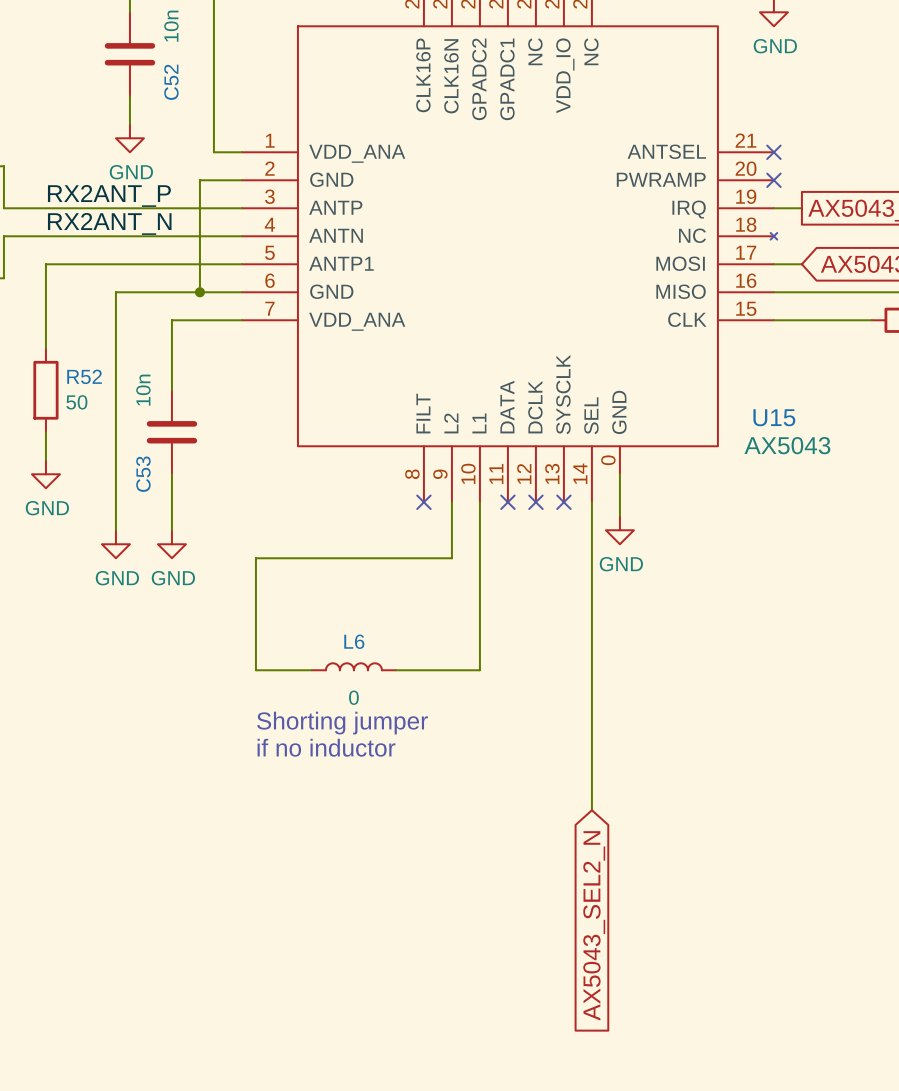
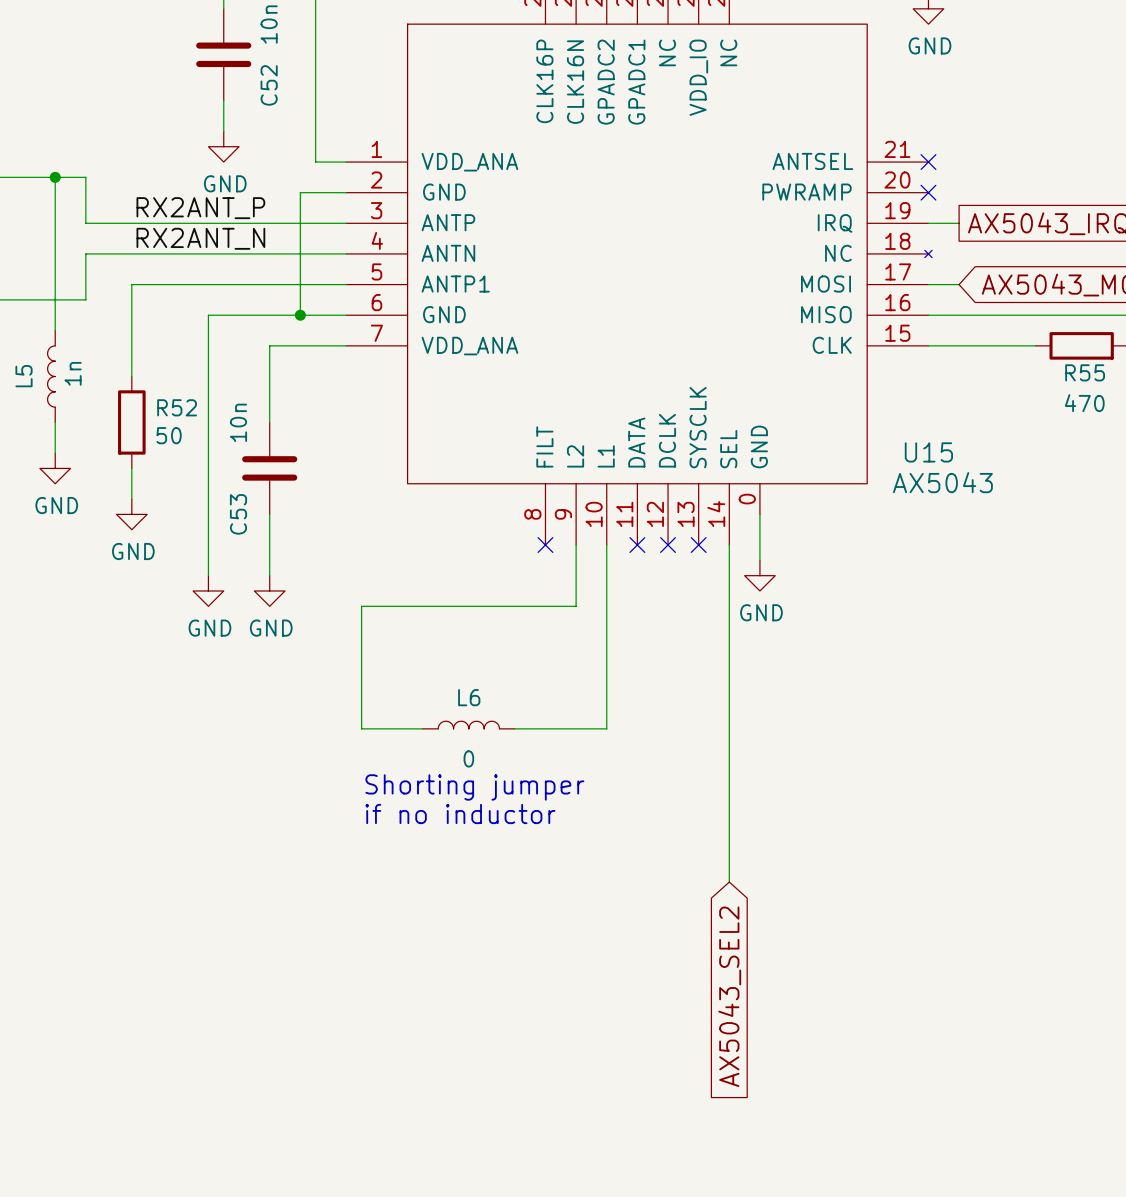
global label: AX5043_SEL2_N (594, 925) -> AX5043_SEL2 (729, 996)

